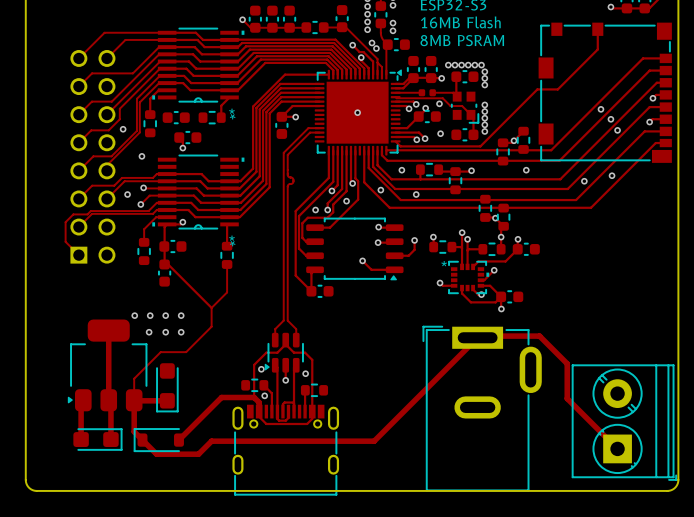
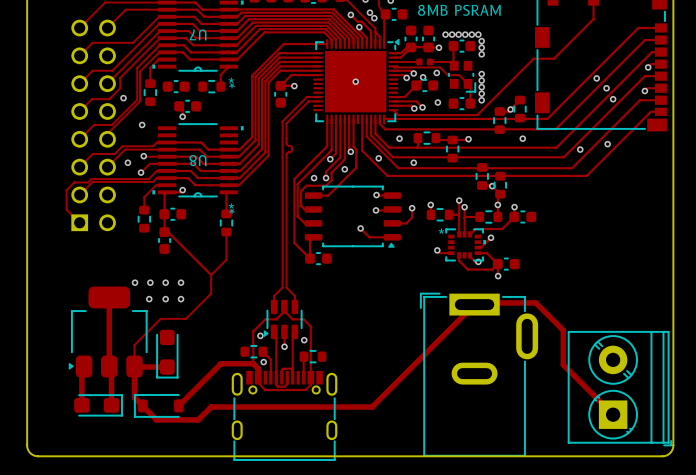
U7 name: none -> U7 (198, 34)
U8 name: none -> U8 (198, 160)

